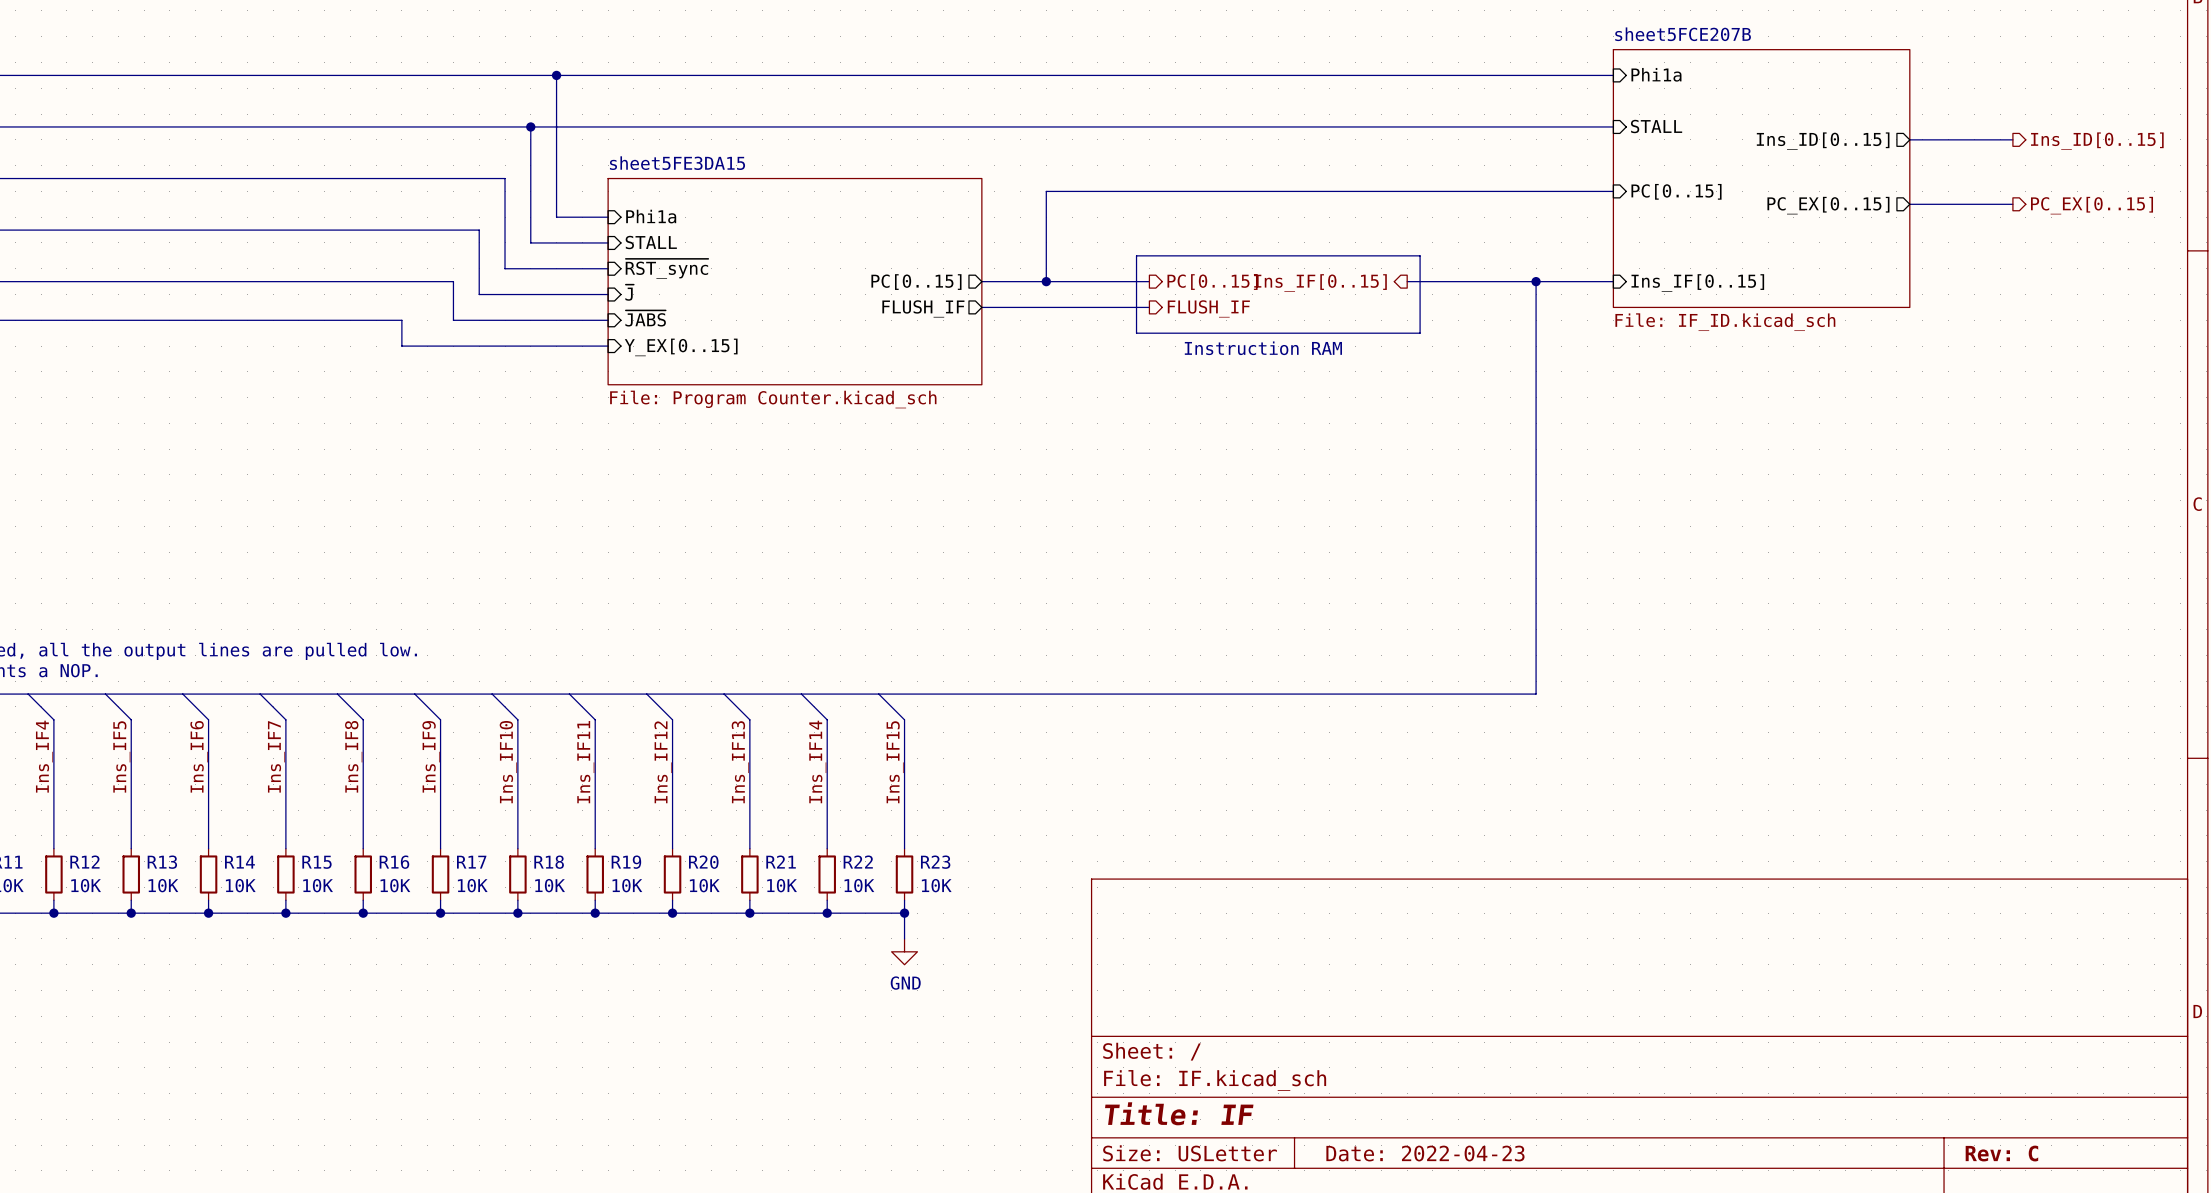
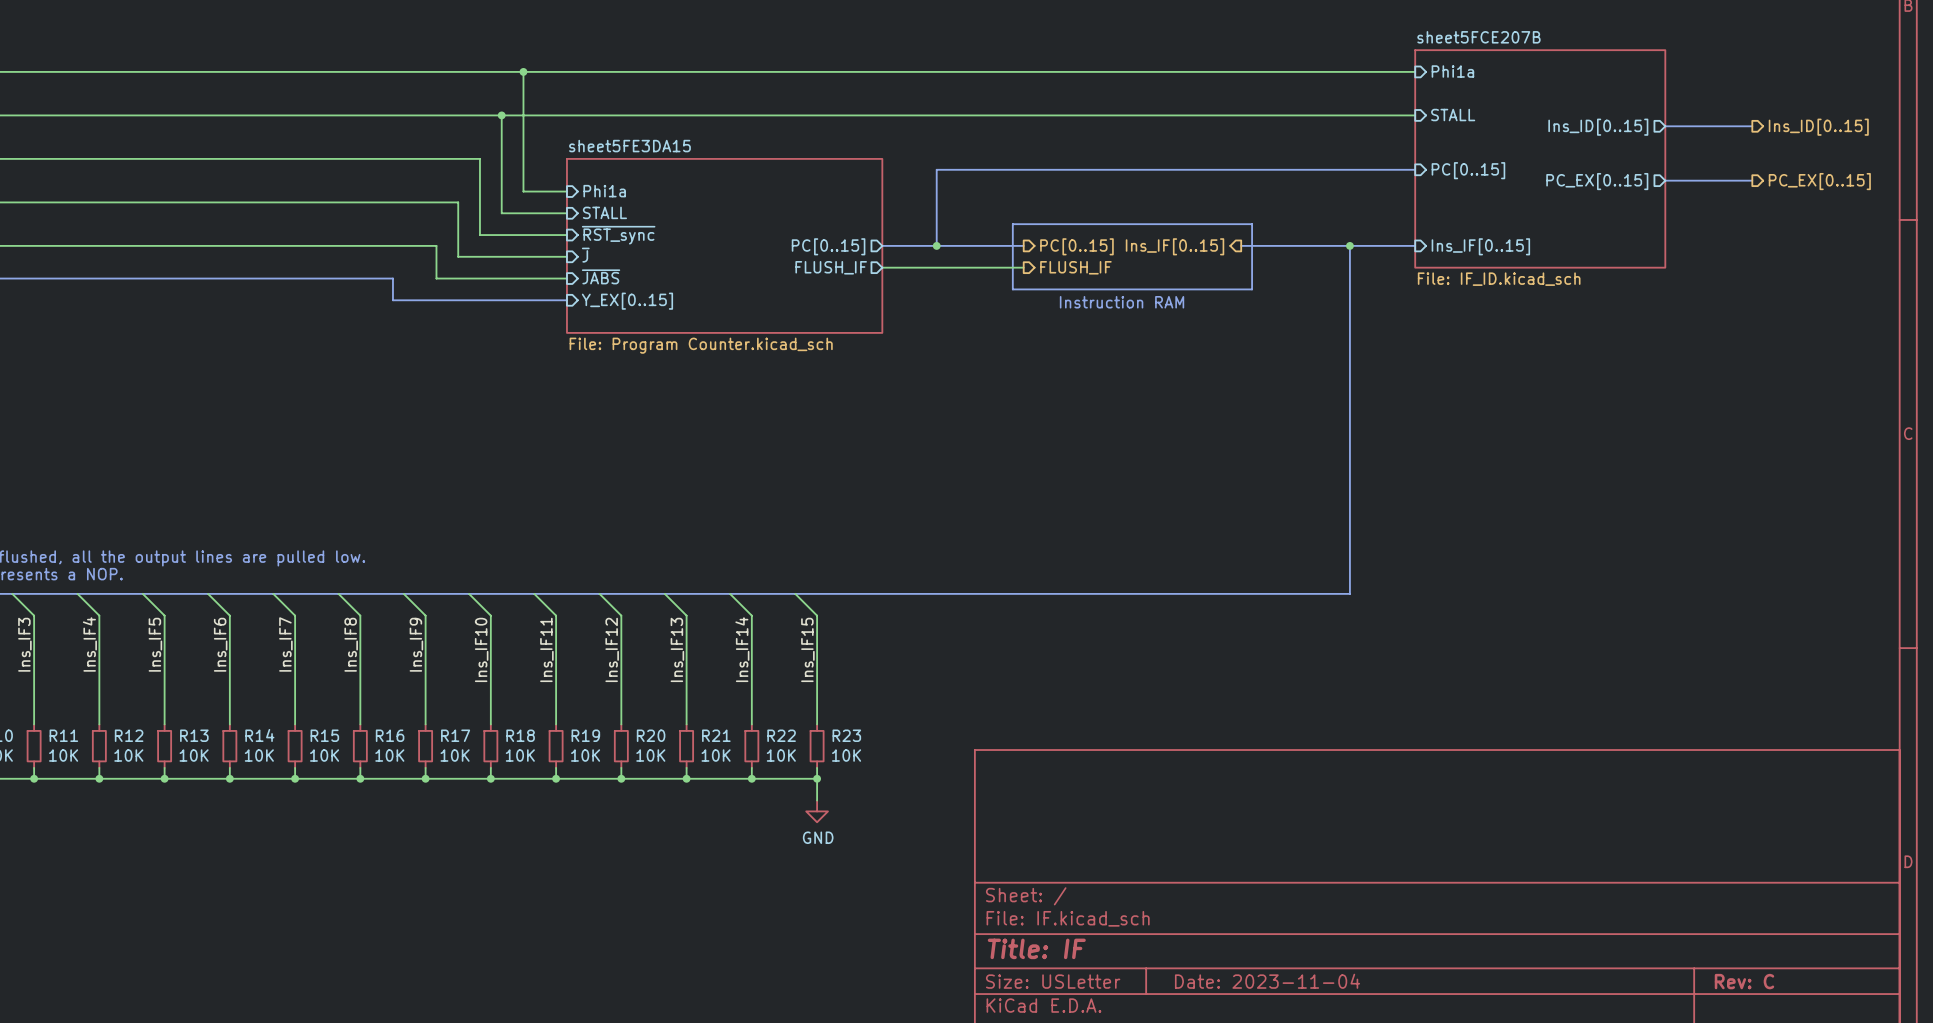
title block: Date: 2022-04-23 (1425, 1153) -> Date: 2023-11-04 (1267, 981)

